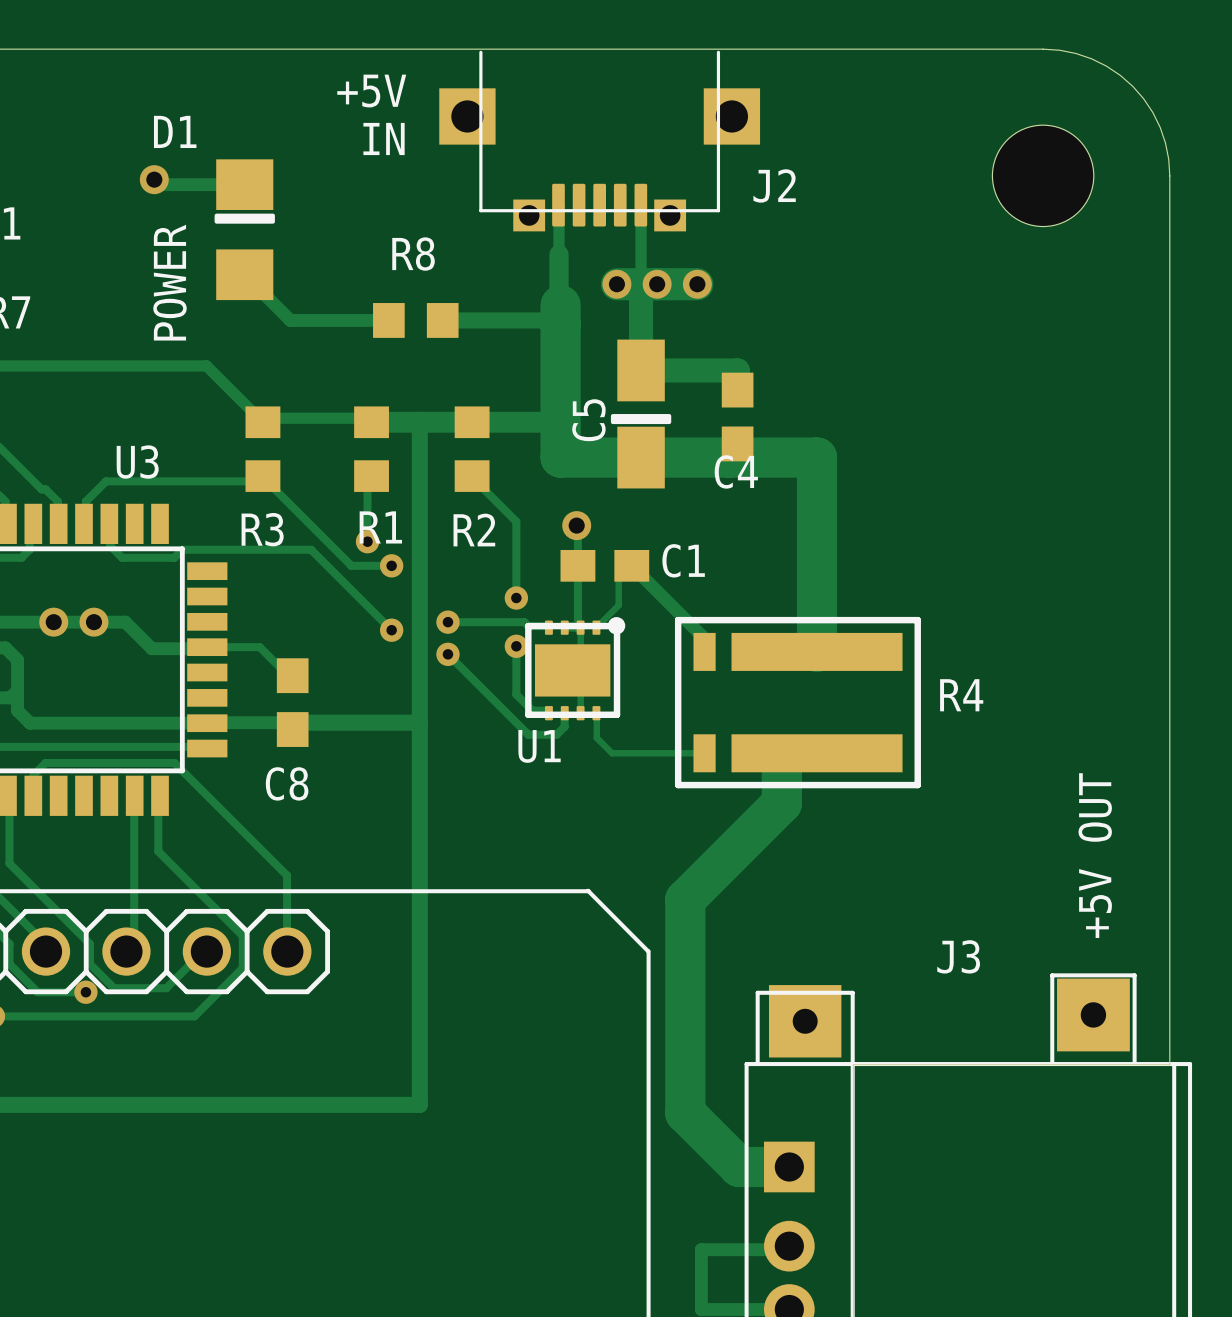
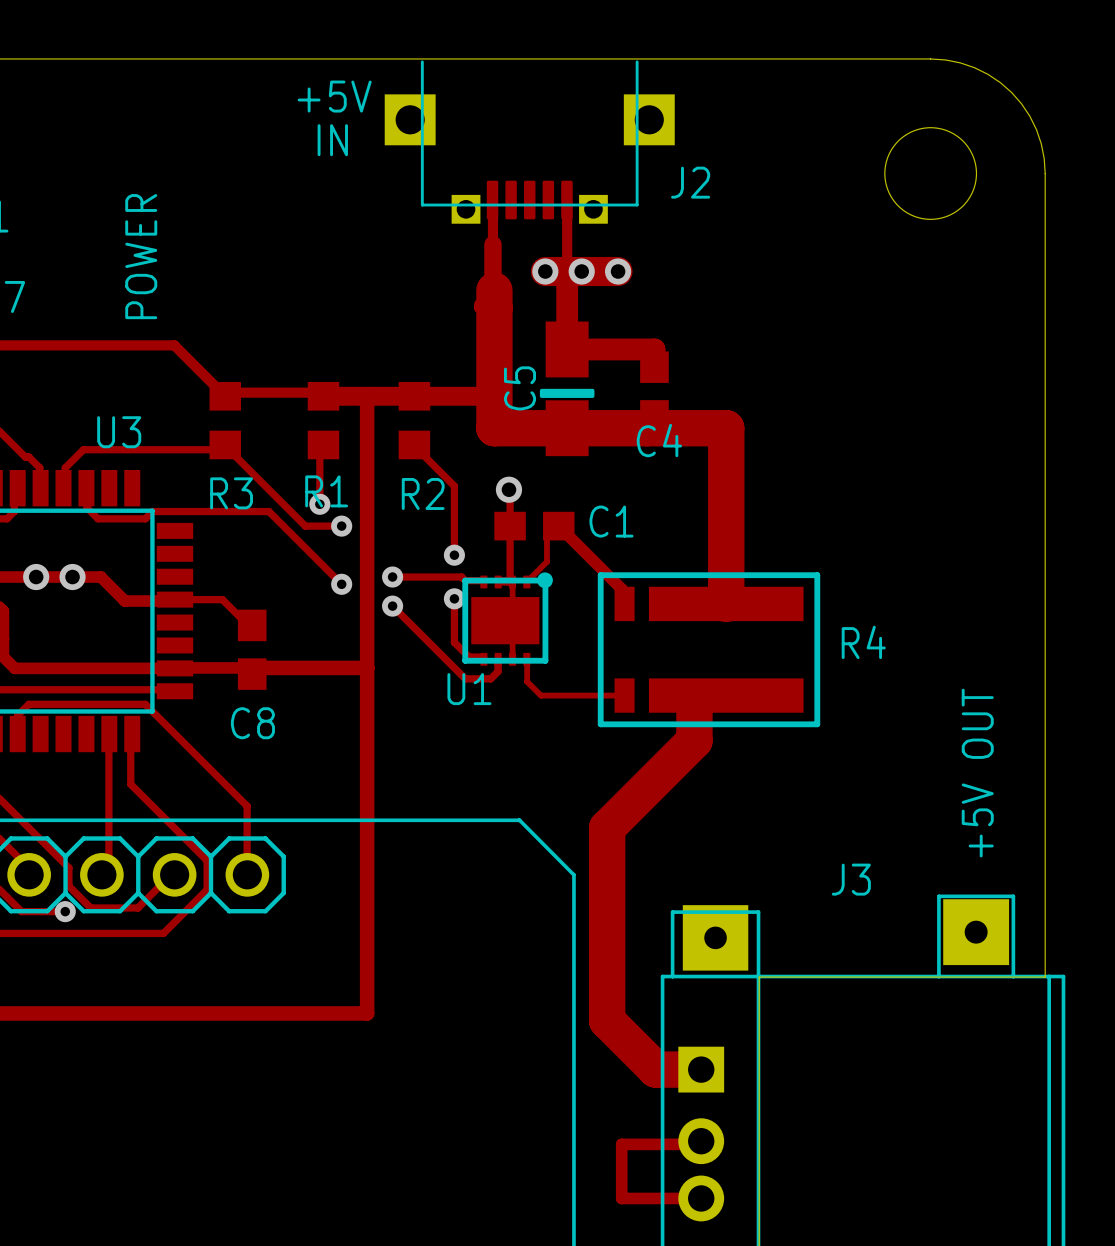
track: (154, 179) (159, 184) (244, 184) -> none
via: (154, 179) -> none
D1: (244, 229) -> none
track: (244, 274) (290, 320) (388, 320) -> none
R8: (415, 320) -> none
track: (543, 320) (442, 320) (443, 321) -> none

